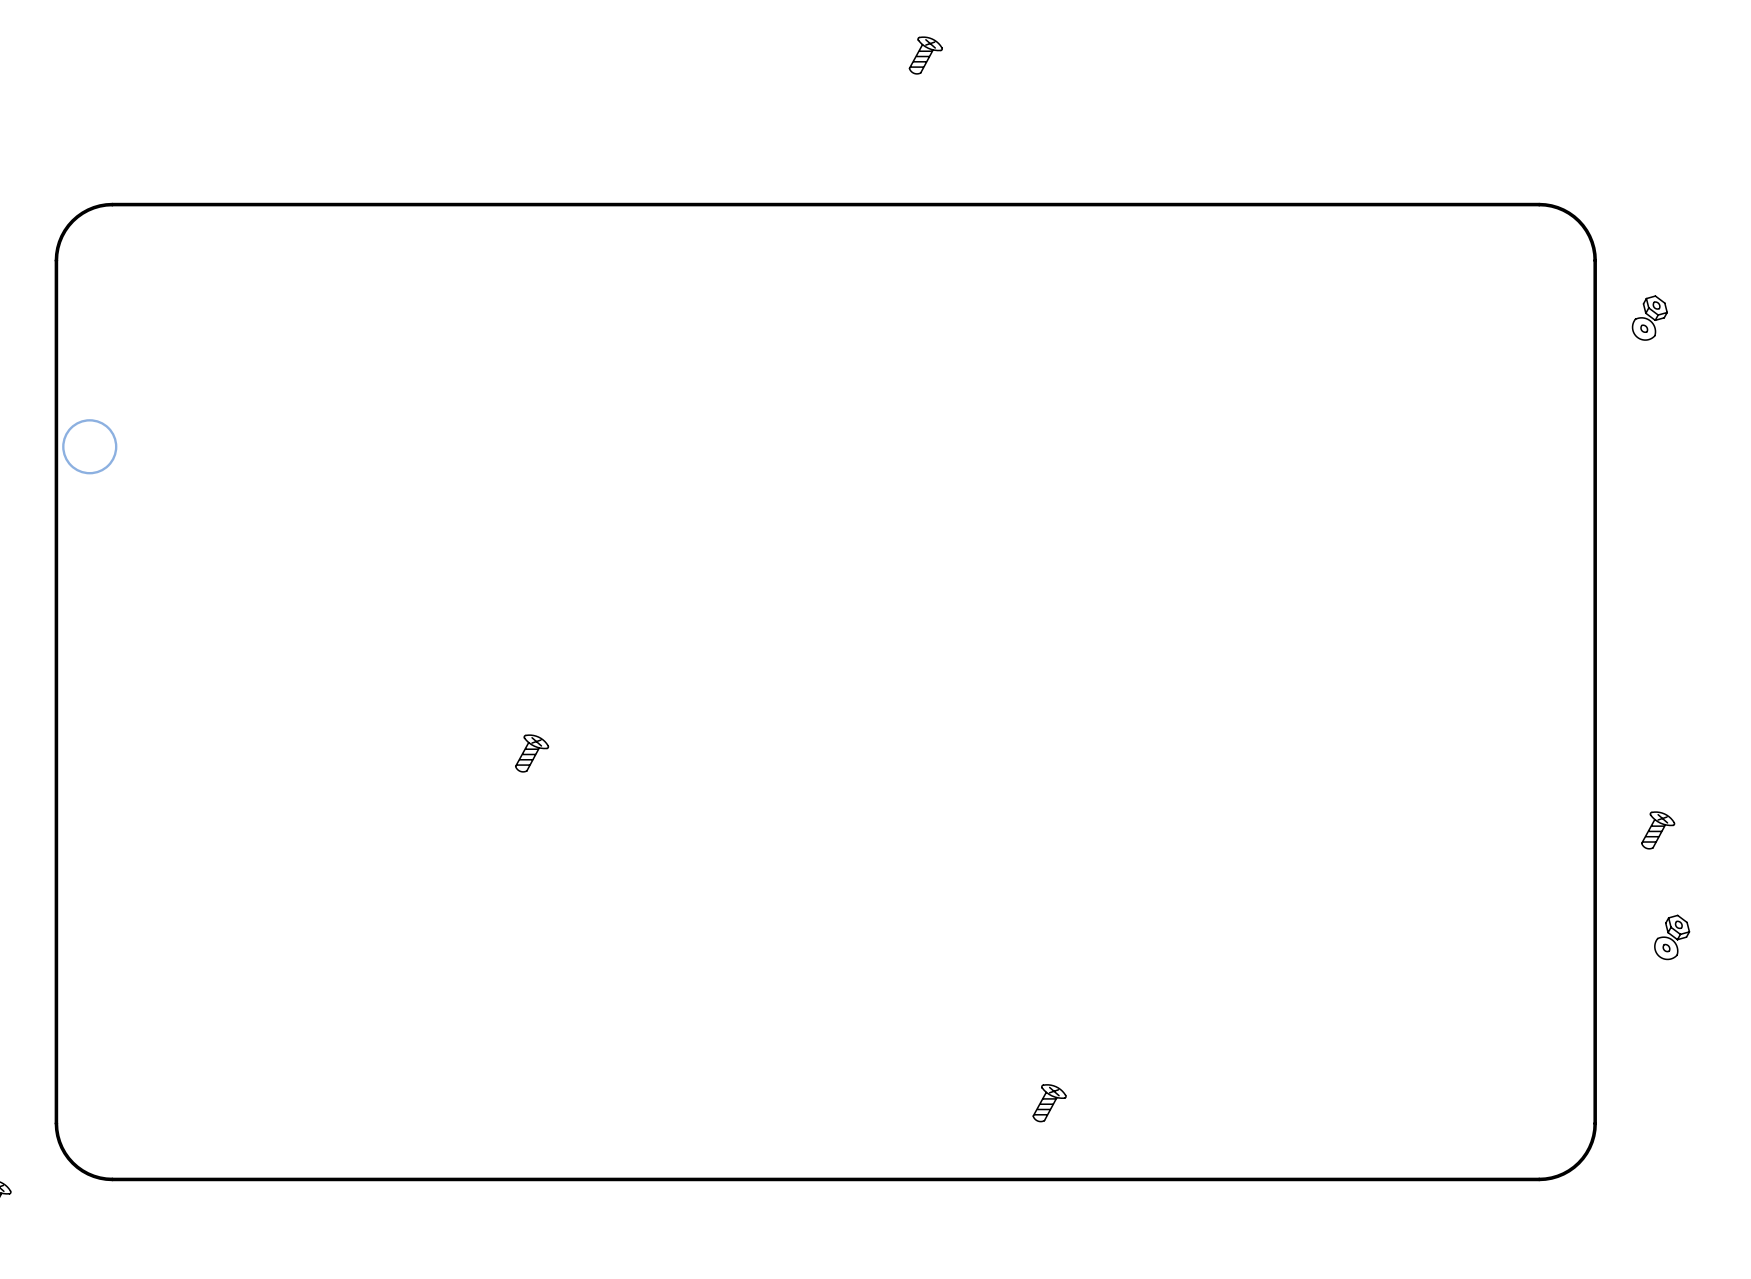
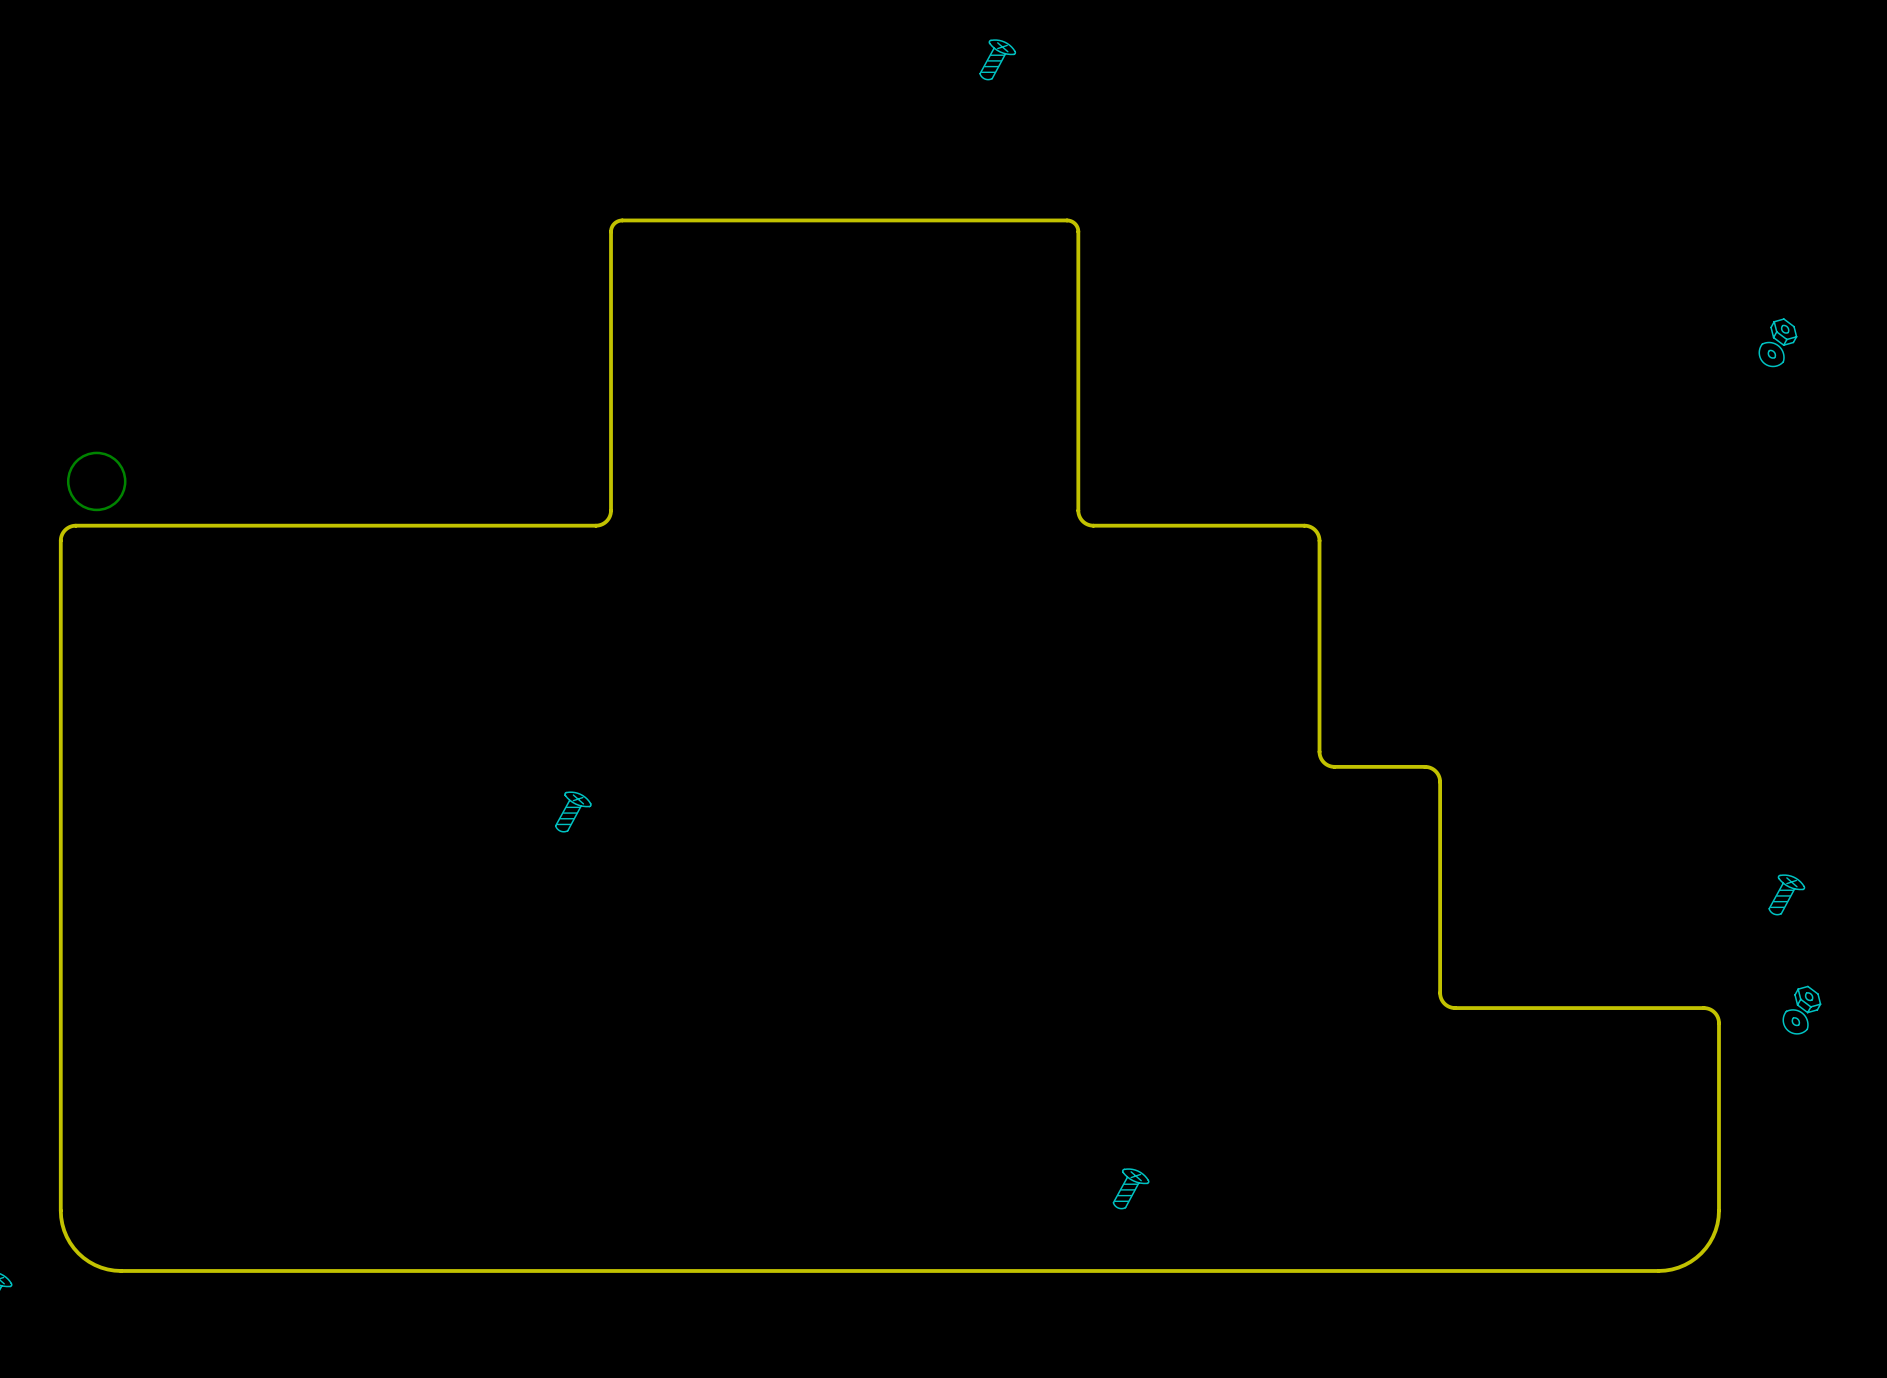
drawing shape: [54, 202, 1597, 1182] -> [58, 218, 1721, 1273]

